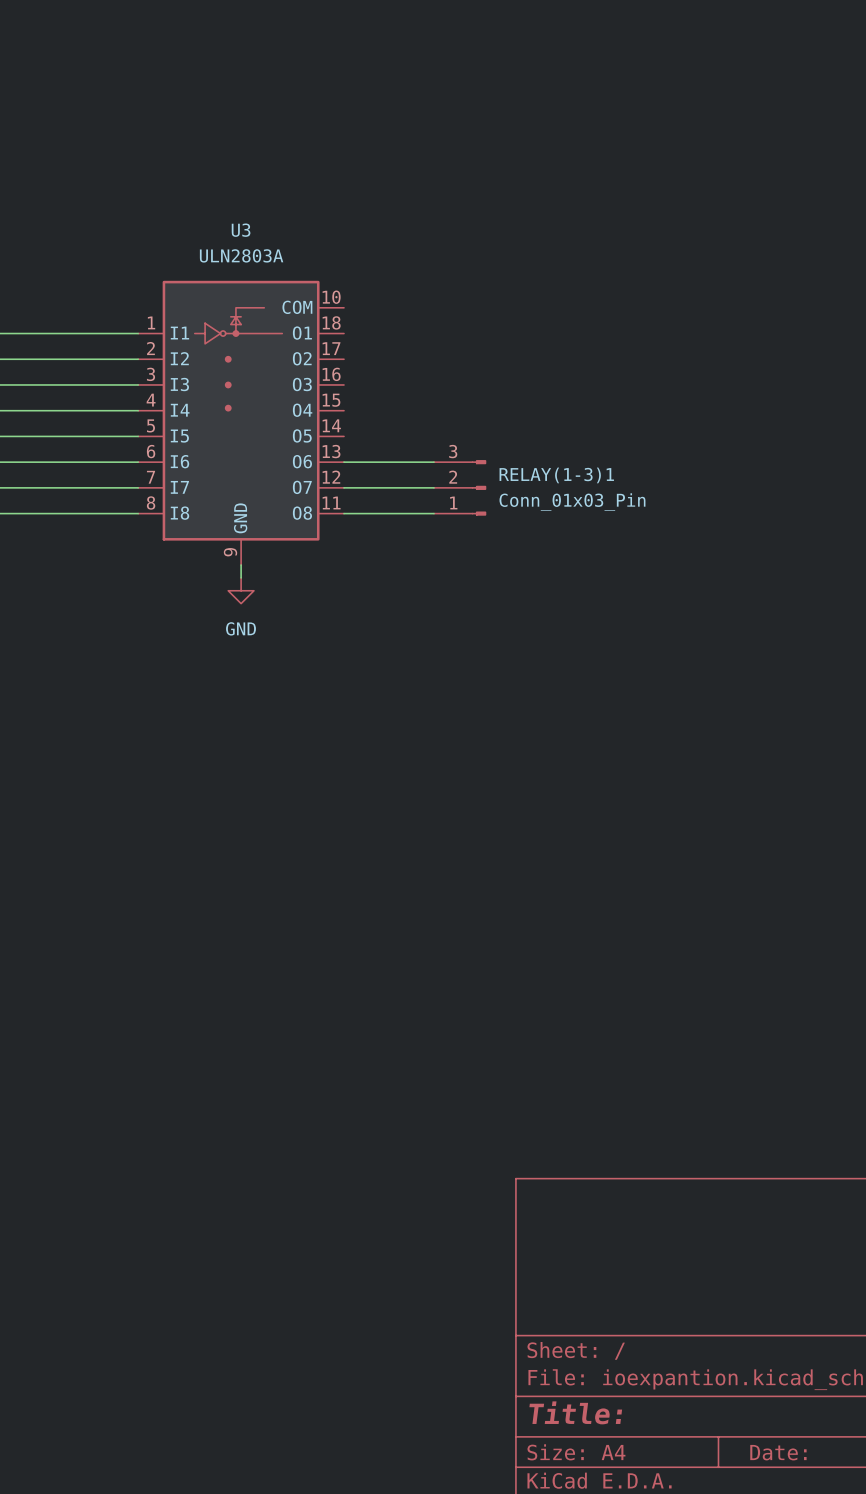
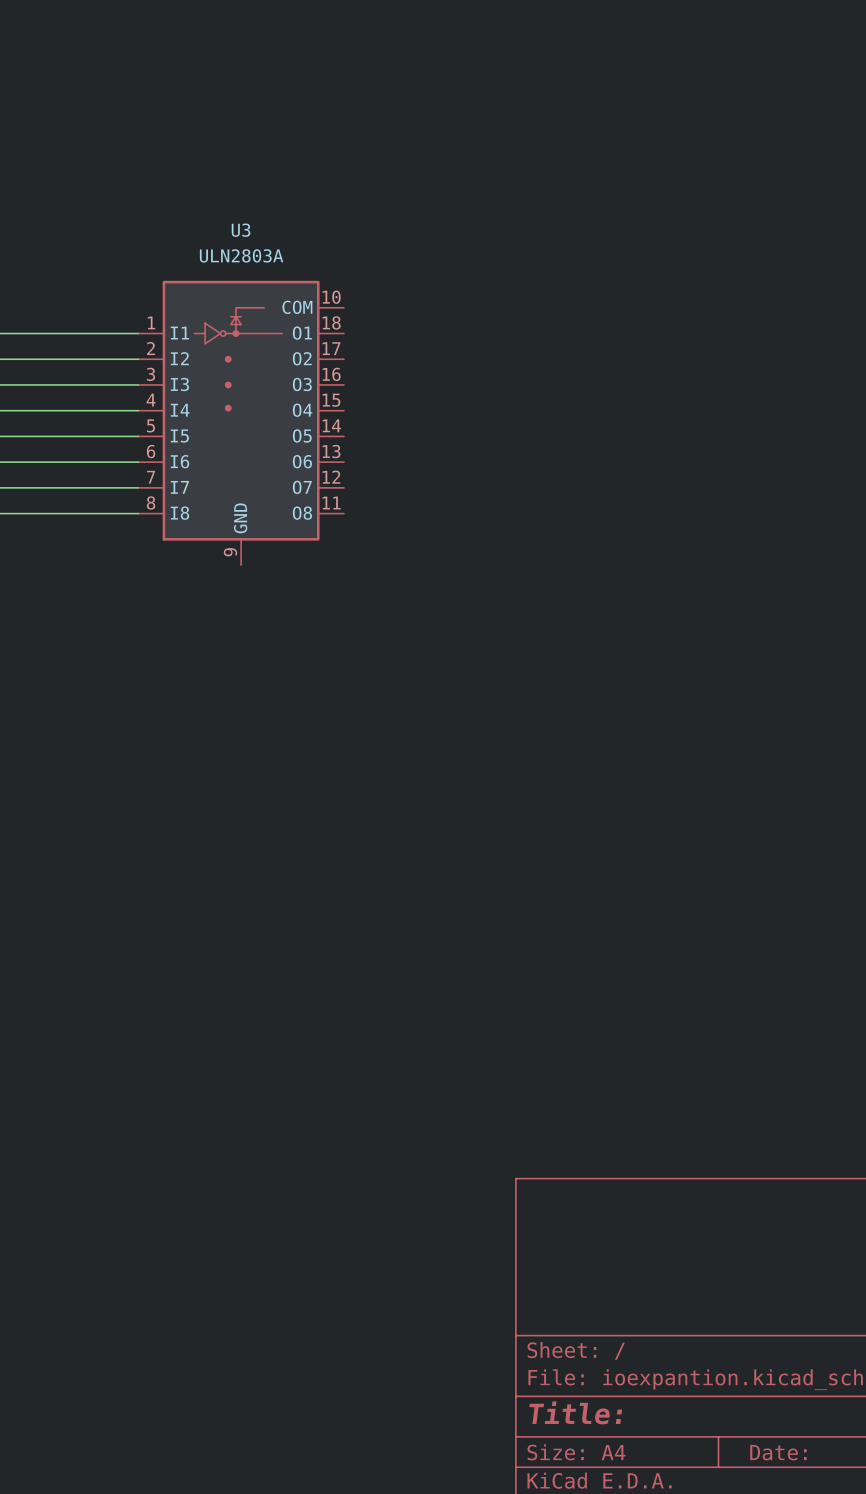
wire: (343, 462) (434, 462) -> none
wire: (343, 487) (434, 487) -> none
RELAY(1-3)1: Conn_01x03_Pin (460, 487) -> none
wire: (343, 513) (434, 513) -> none
wire: (241, 565) (241, 577) -> none
power symbol: GND (241, 590) -> none

